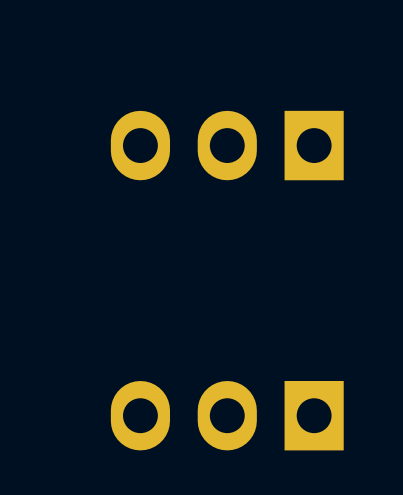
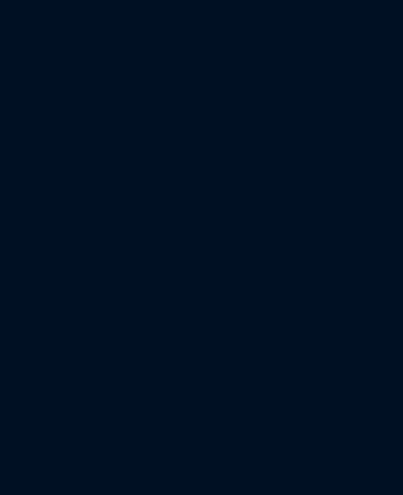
part: (227, 145) -> none
part: (227, 415) -> none

